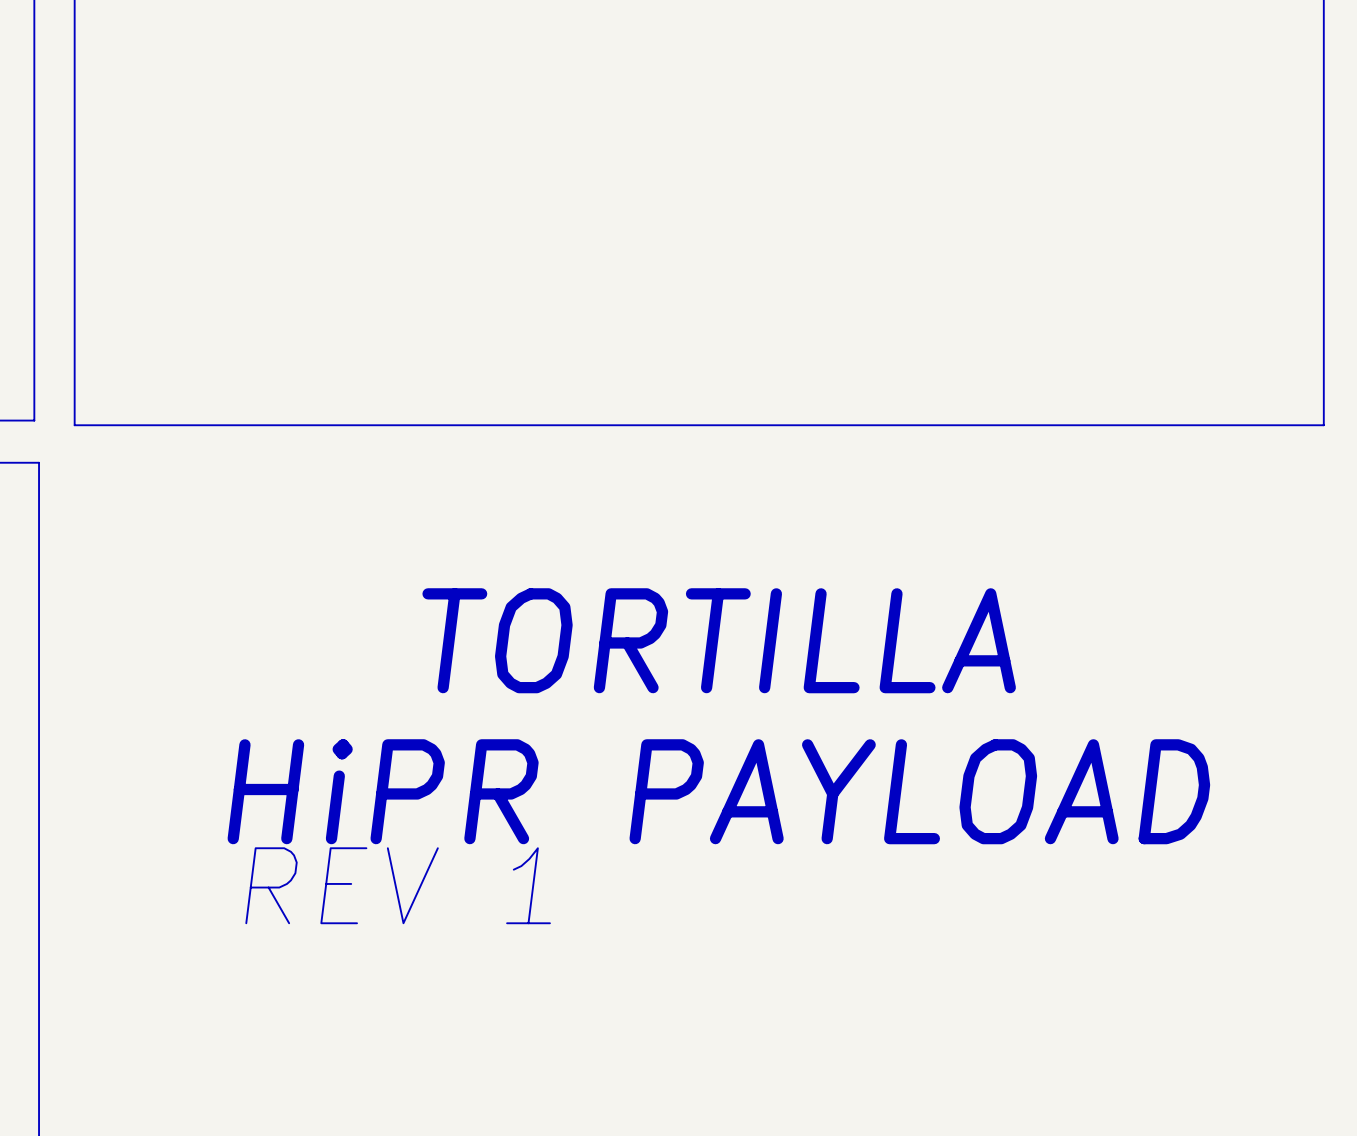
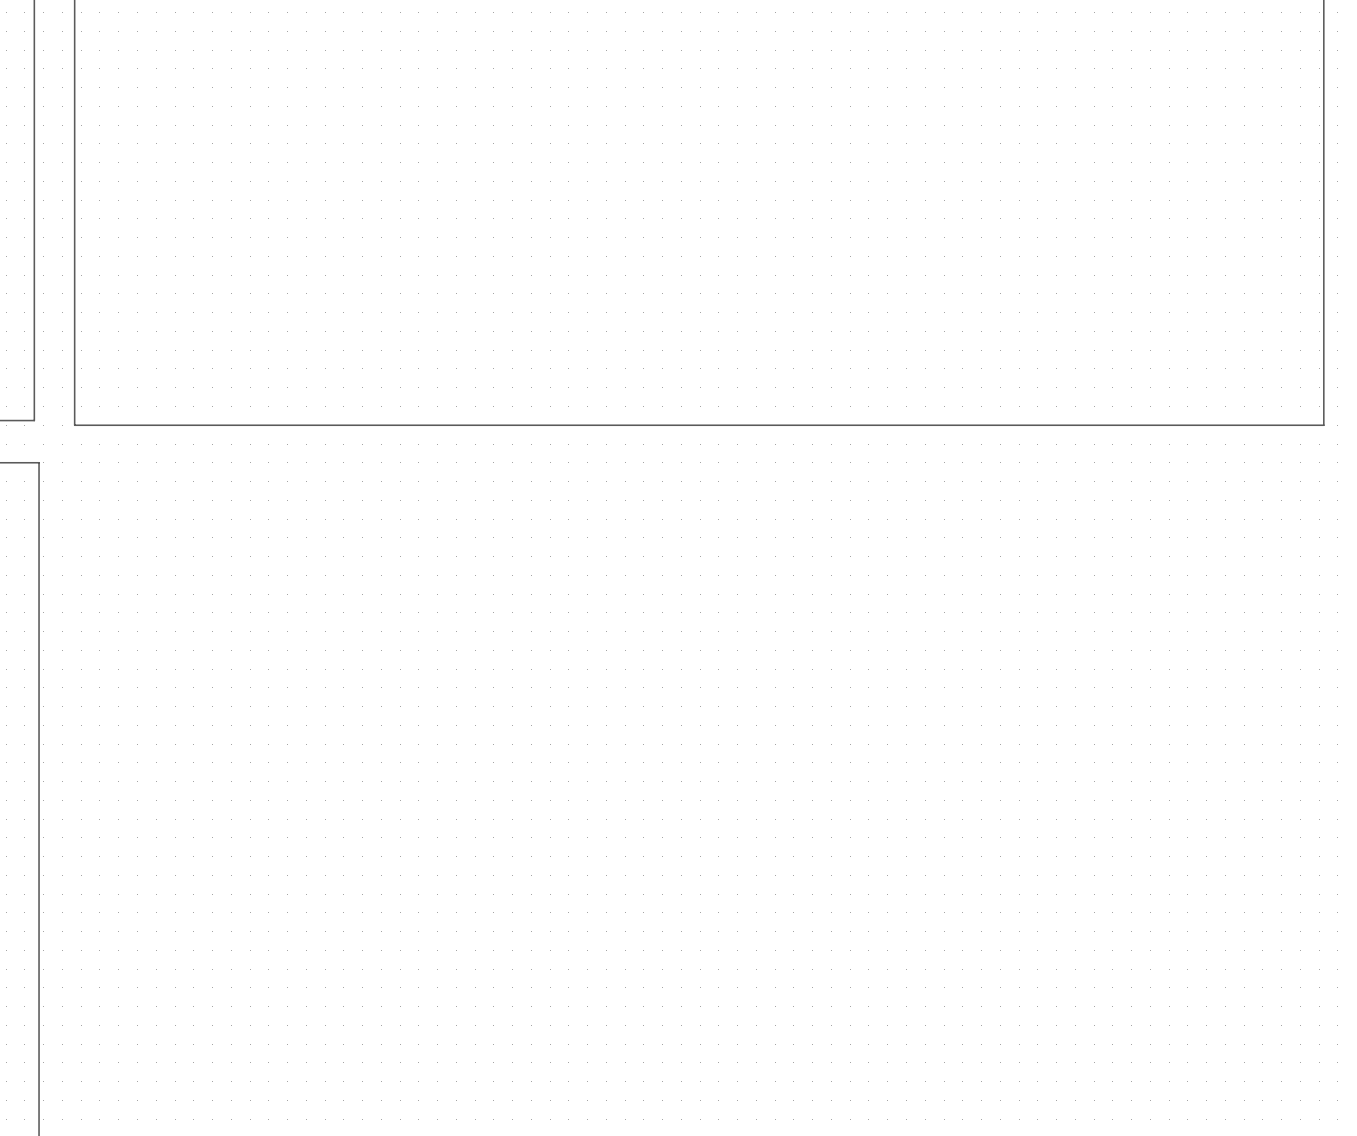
text: TORTILLA (719, 640) -> none
text: HiPR PAYLOAD (718, 791) -> none
text: REV 1 (398, 885) -> none

